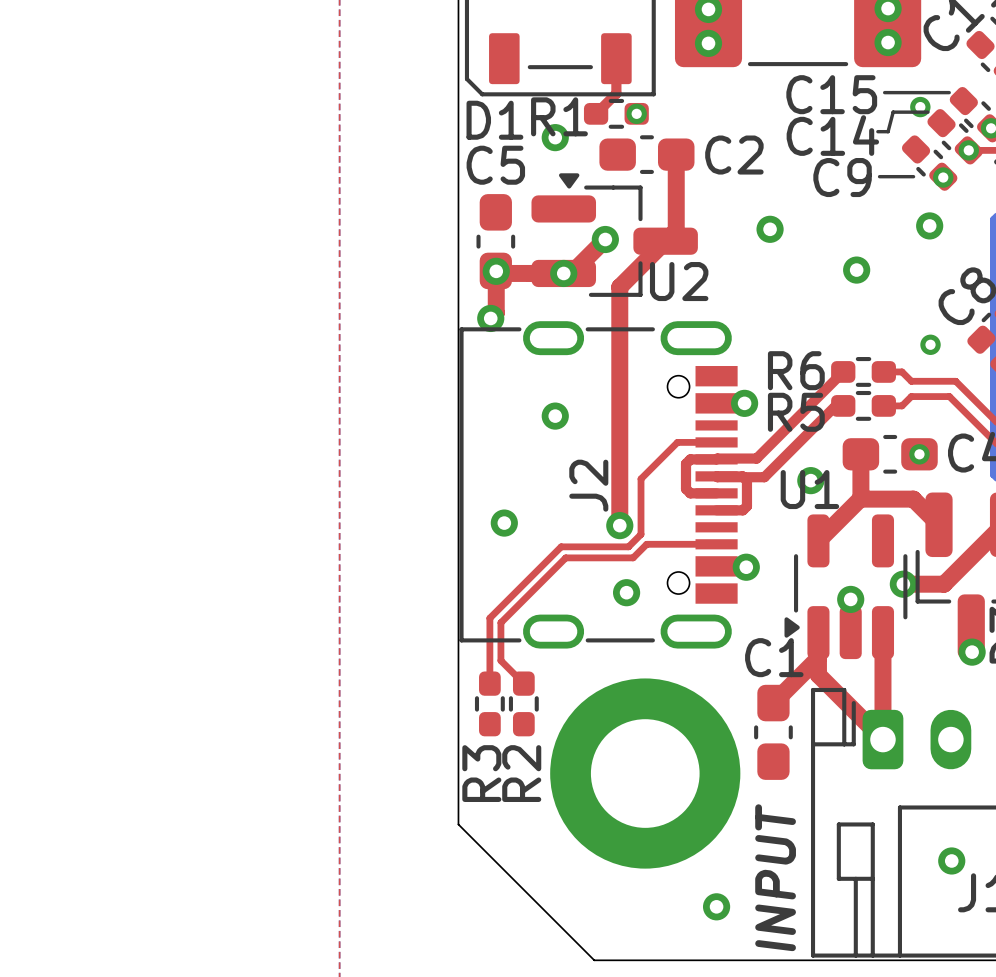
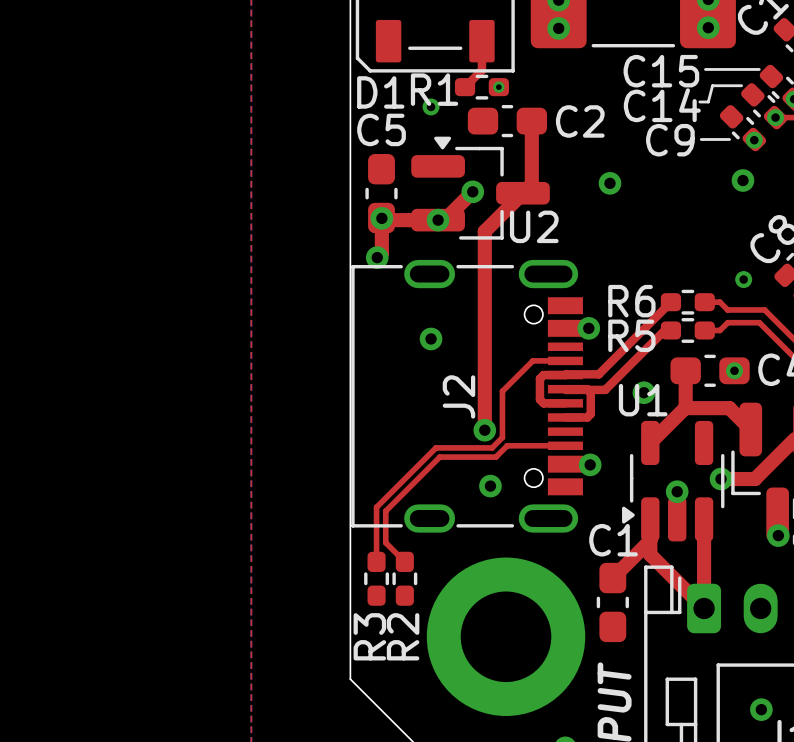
via: (920, 107) -> none
via position: (636, 113) -> (431, 106)
via: none -> (498, 87)
via: (555, 137) -> none
via: (856, 270) -> none
via: (504, 523) -> none

